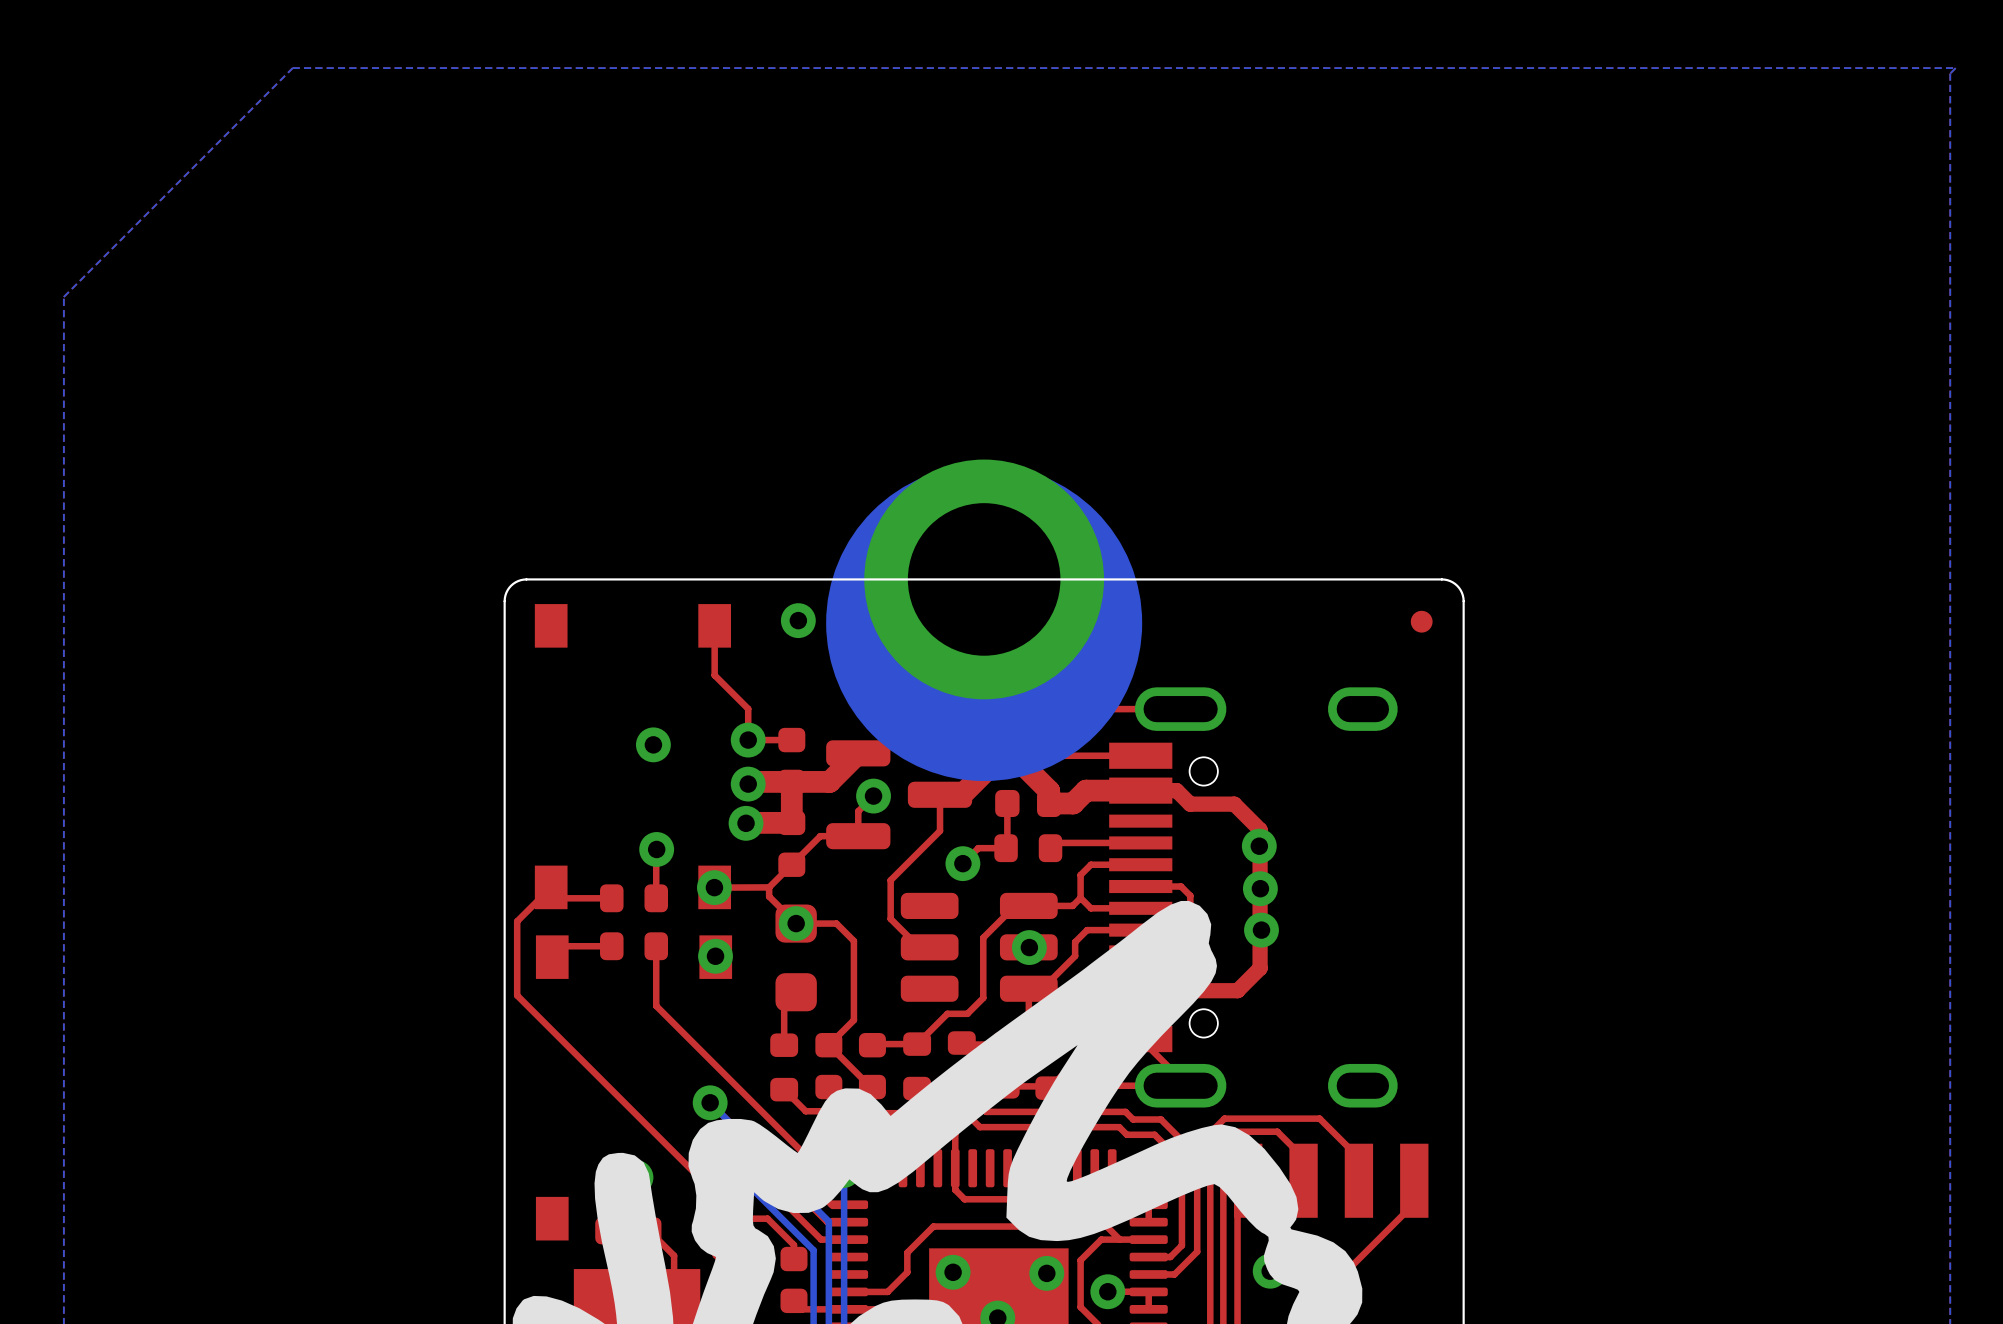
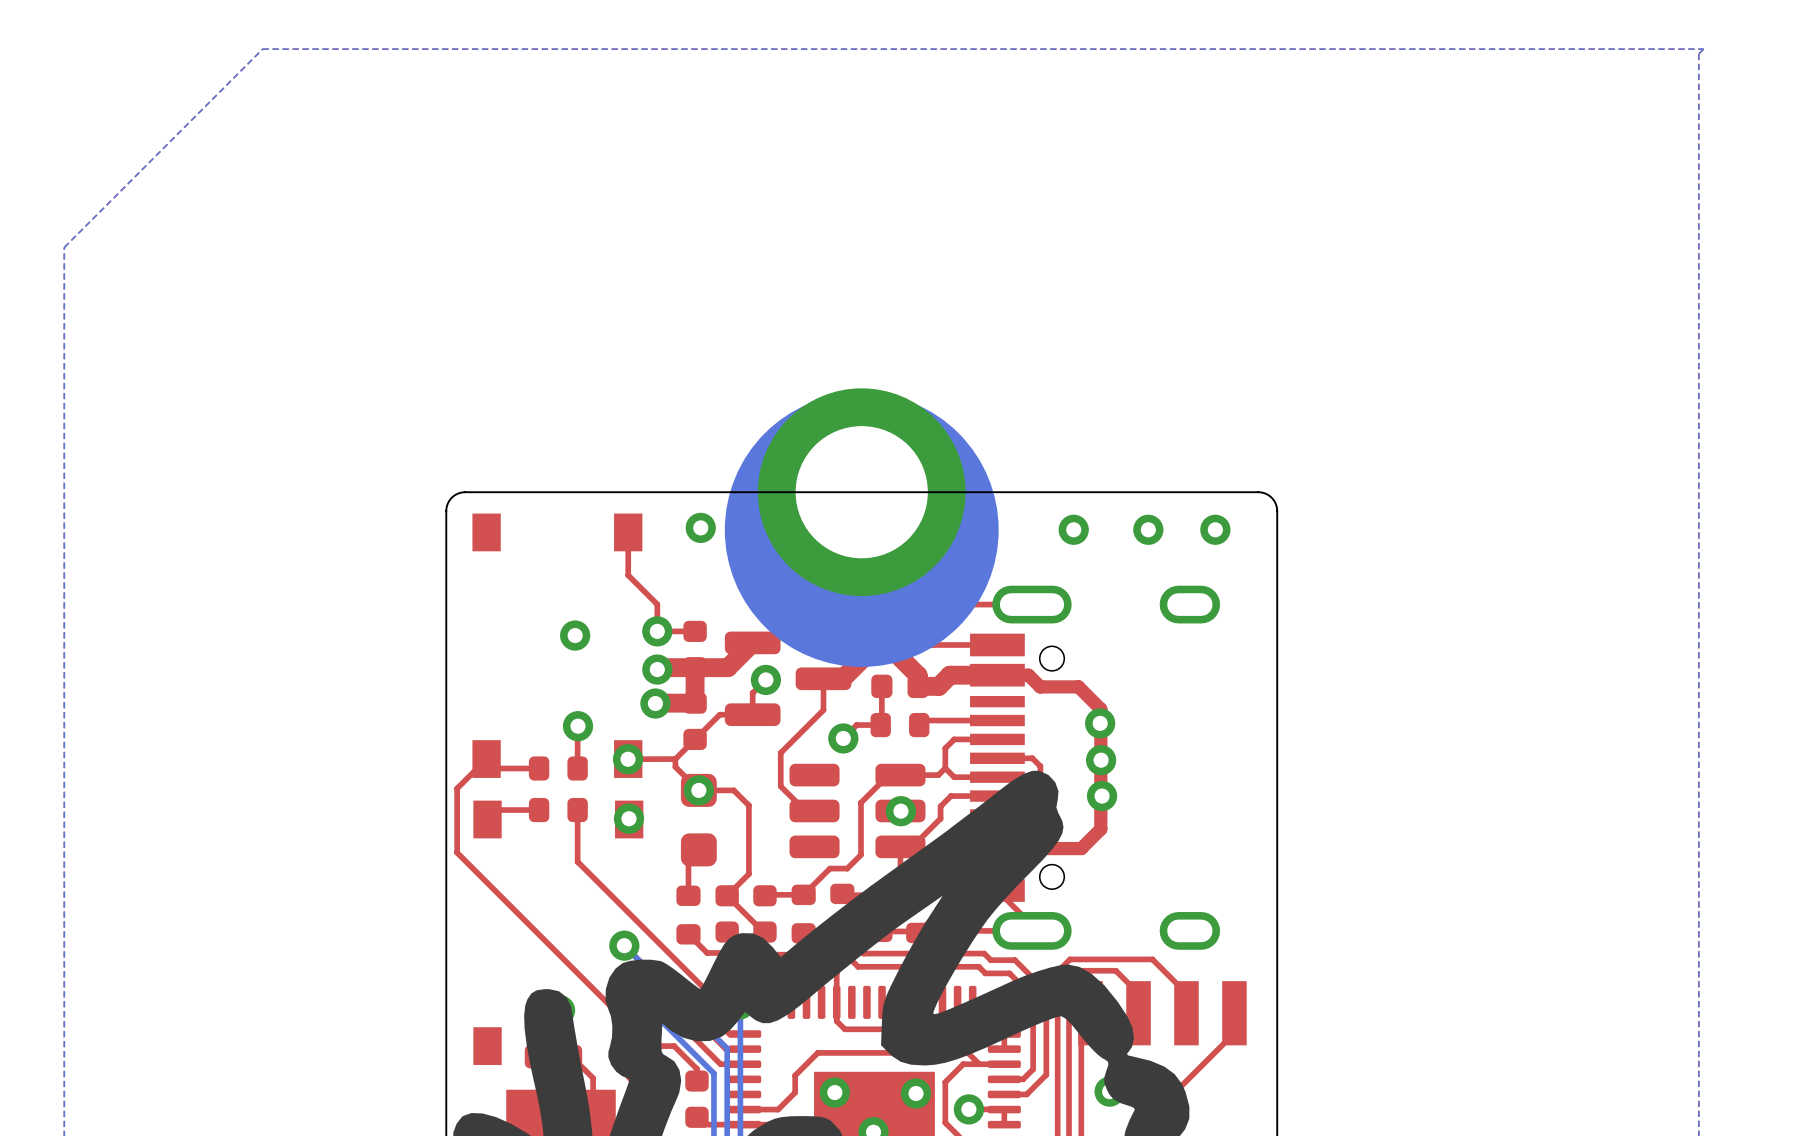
part: (1421, 621) -> none
via: none -> (1073, 529)
via: none -> (1148, 529)
via: none -> (1215, 529)

